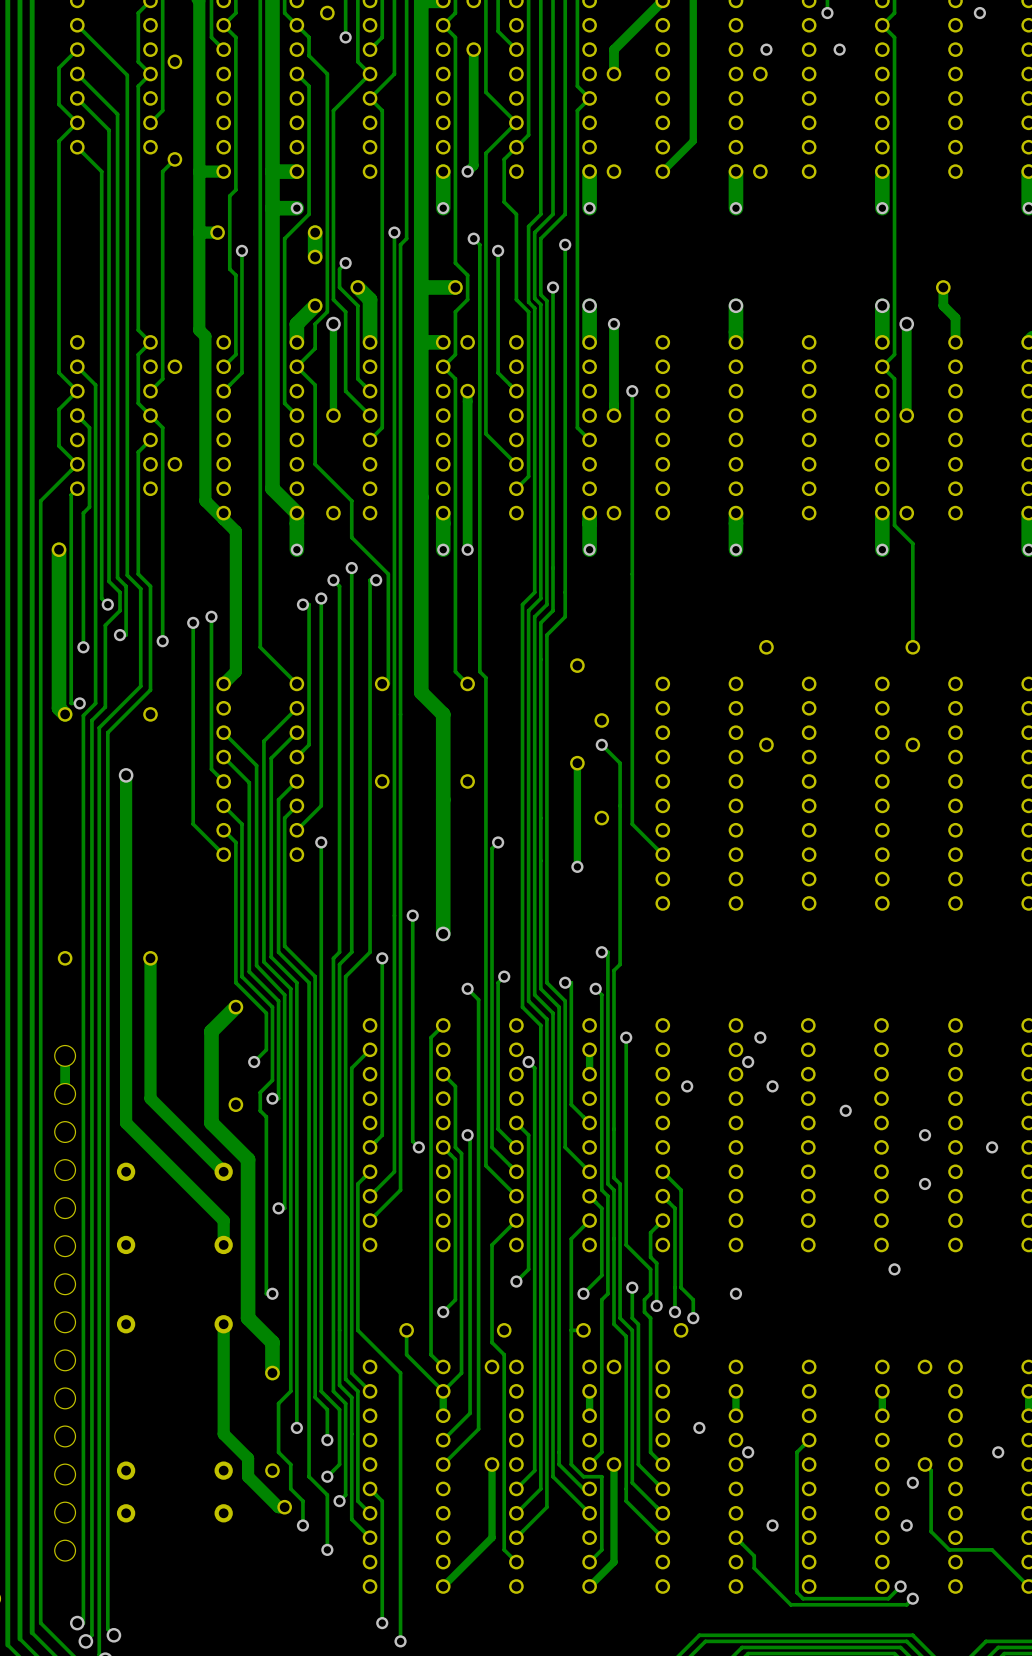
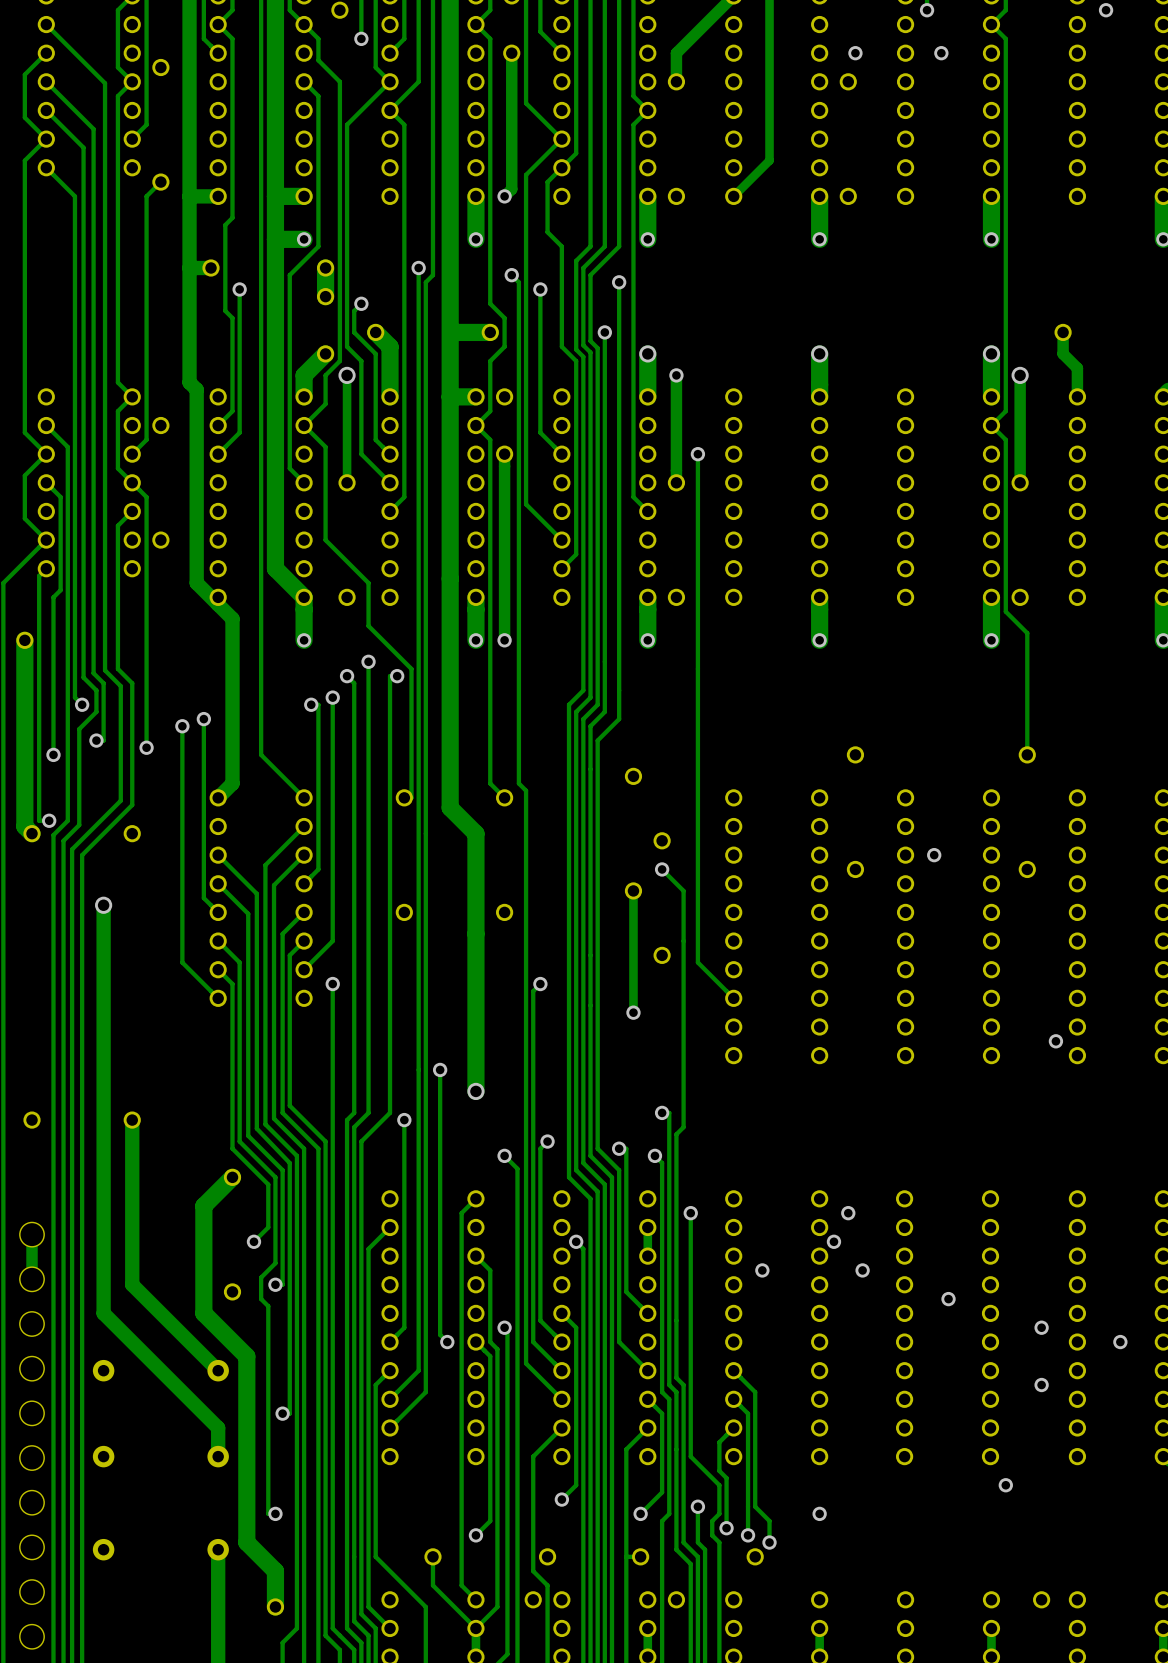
via: none -> (934, 855)
via: none -> (1055, 1041)

